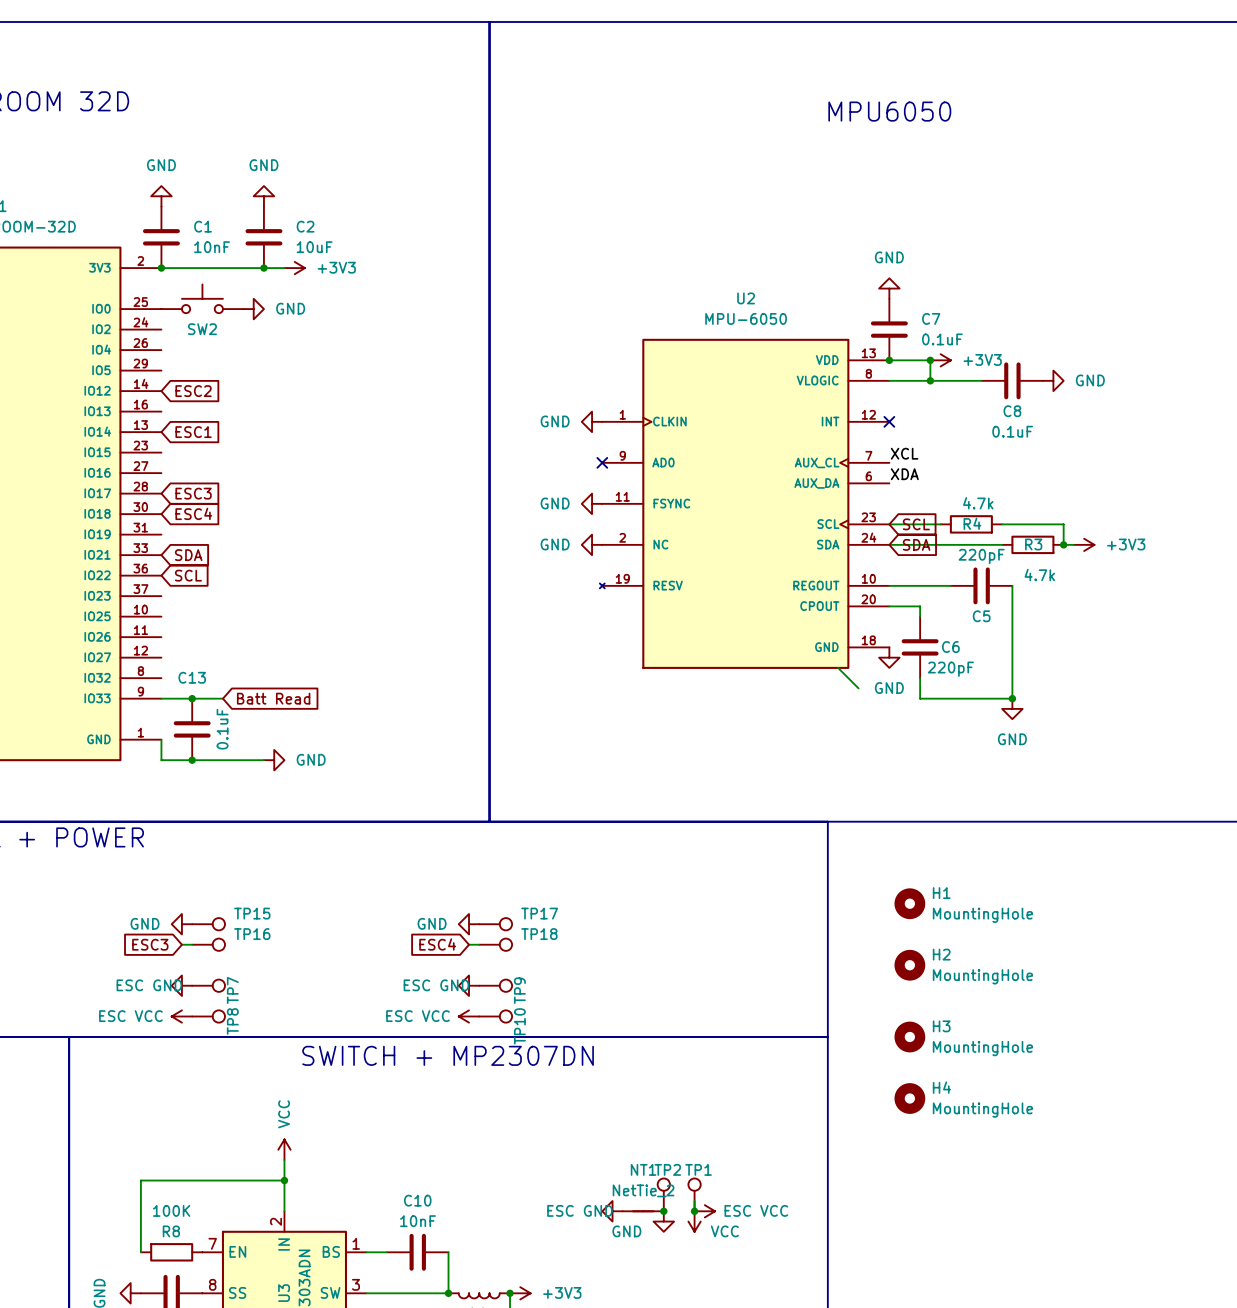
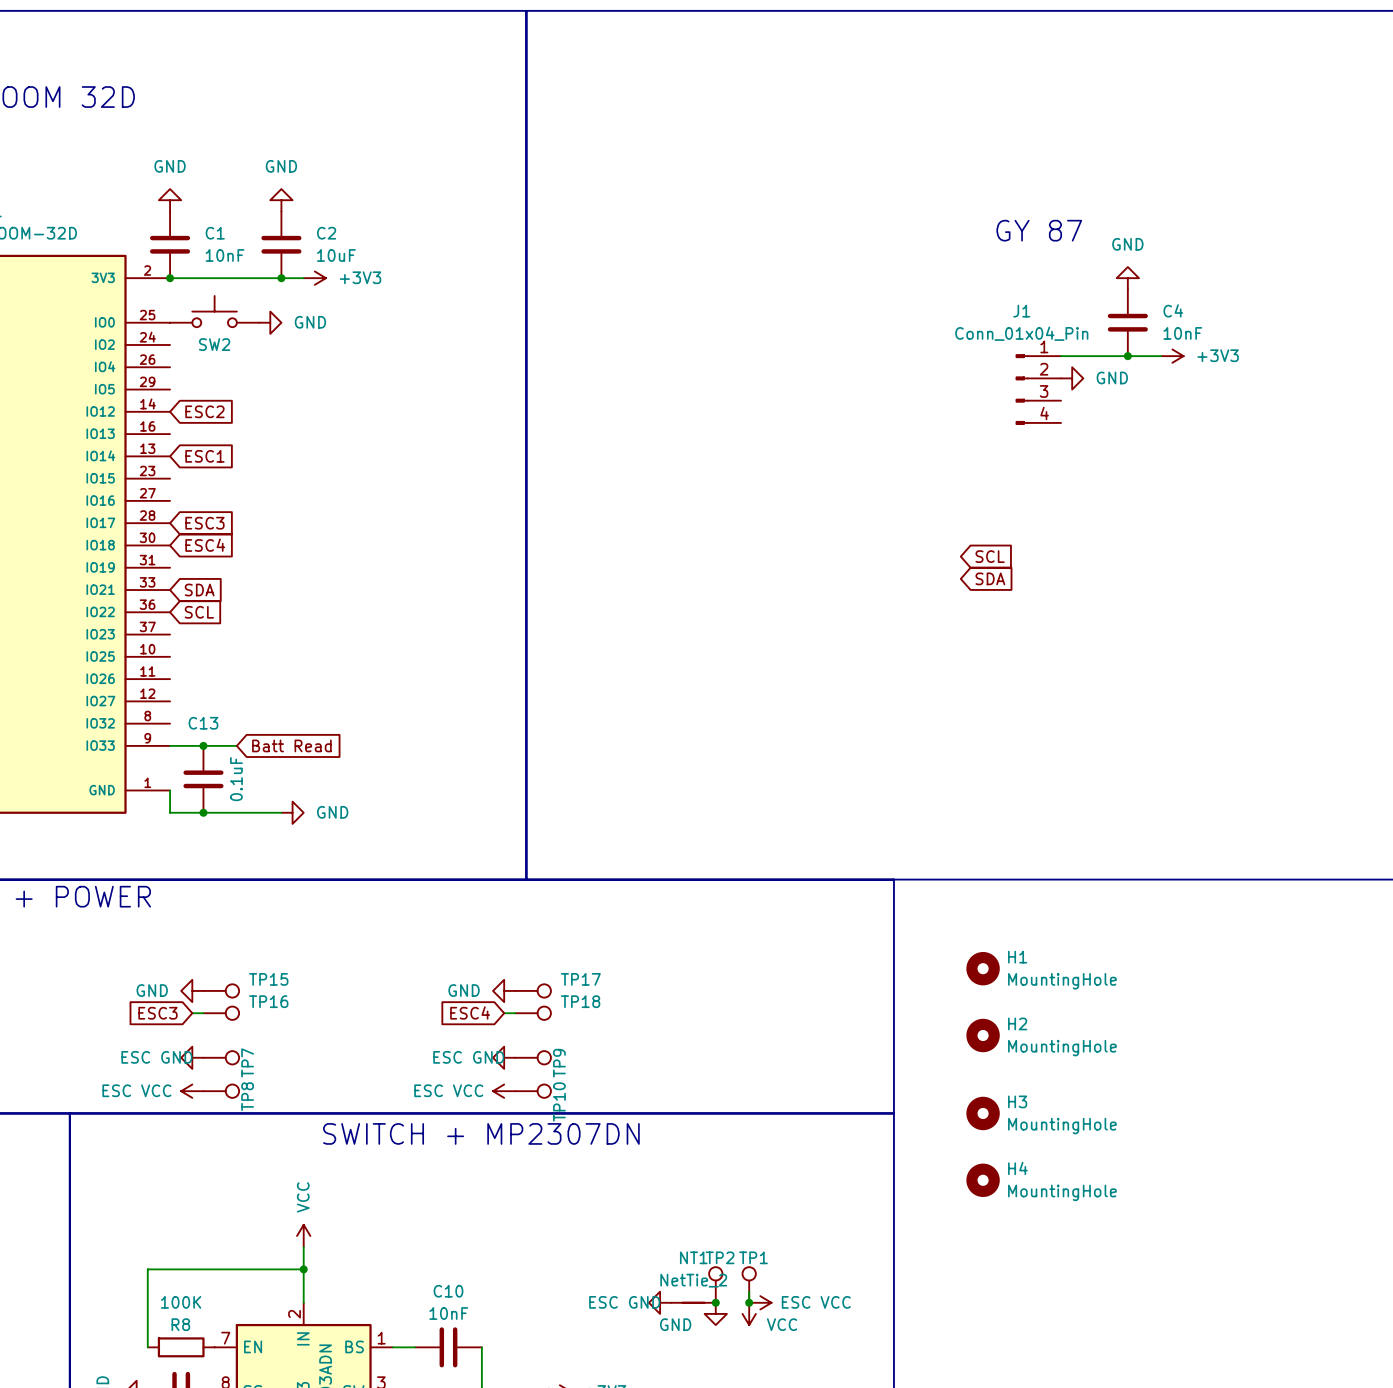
text: MPU6050 (889, 111) -> none
text: none -> GY 87 (1039, 230)
power symbol: none -> GND (1127, 278)
power symbol: GND (889, 288) -> none
C4: none -> 10nF (1127, 322)
C7: 0.1uF (889, 329) -> none
junction: none -> (1127, 356)
power symbol: none -> +3V3 (1172, 356)
wire: (889, 360) (930, 360) (930, 380) -> none
junction: (889, 360) -> none
junction: (930, 360) -> none
power symbol: +3V3 (940, 360) -> none
power symbol: none -> GND (1072, 378)
J1: none -> Conn_01x04_Pin (1038, 389)
wire: (889, 380) (981, 380) -> (1061, 356) (1161, 356)
junction: (930, 380) -> none
C8: 0.1uF (1012, 380) -> none
power symbol: GND (1053, 380) -> none
power symbol: GND (592, 421) -> none
no-connect mark: (889, 421) -> none
label: XCL (904, 453) -> none
no-connect mark: (602, 462) -> none
label: XDA (904, 474) -> none
power symbol: GND (592, 503) -> none
U2: MPU-6050 (744, 503) -> none
wire: (889, 524) (940, 524) -> none
R4: 4.7k (971, 524) -> none
wire: (1002, 524) (1063, 524) (1063, 544) (1073, 544) -> none
power symbol: GND (592, 544) -> none
wire: (889, 544) (1002, 544) -> none
R3: 4.7k (1032, 544) -> none
junction: (1063, 544) -> none
power symbol: +3V3 (1084, 544) -> none
wire: (889, 585) (950, 585) -> none
C5: 220pF (981, 585) -> none
wire: (1012, 585) (1012, 698) (920, 698) (920, 678) -> none
wire: (889, 606) (920, 606) (920, 616) -> none
C6: 220pF (920, 647) -> none
power symbol: GND (889, 657) -> none
wire: (838, 667) (858, 688) -> none
junction: (1012, 698) -> none
power symbol: GND (1012, 708) -> none

